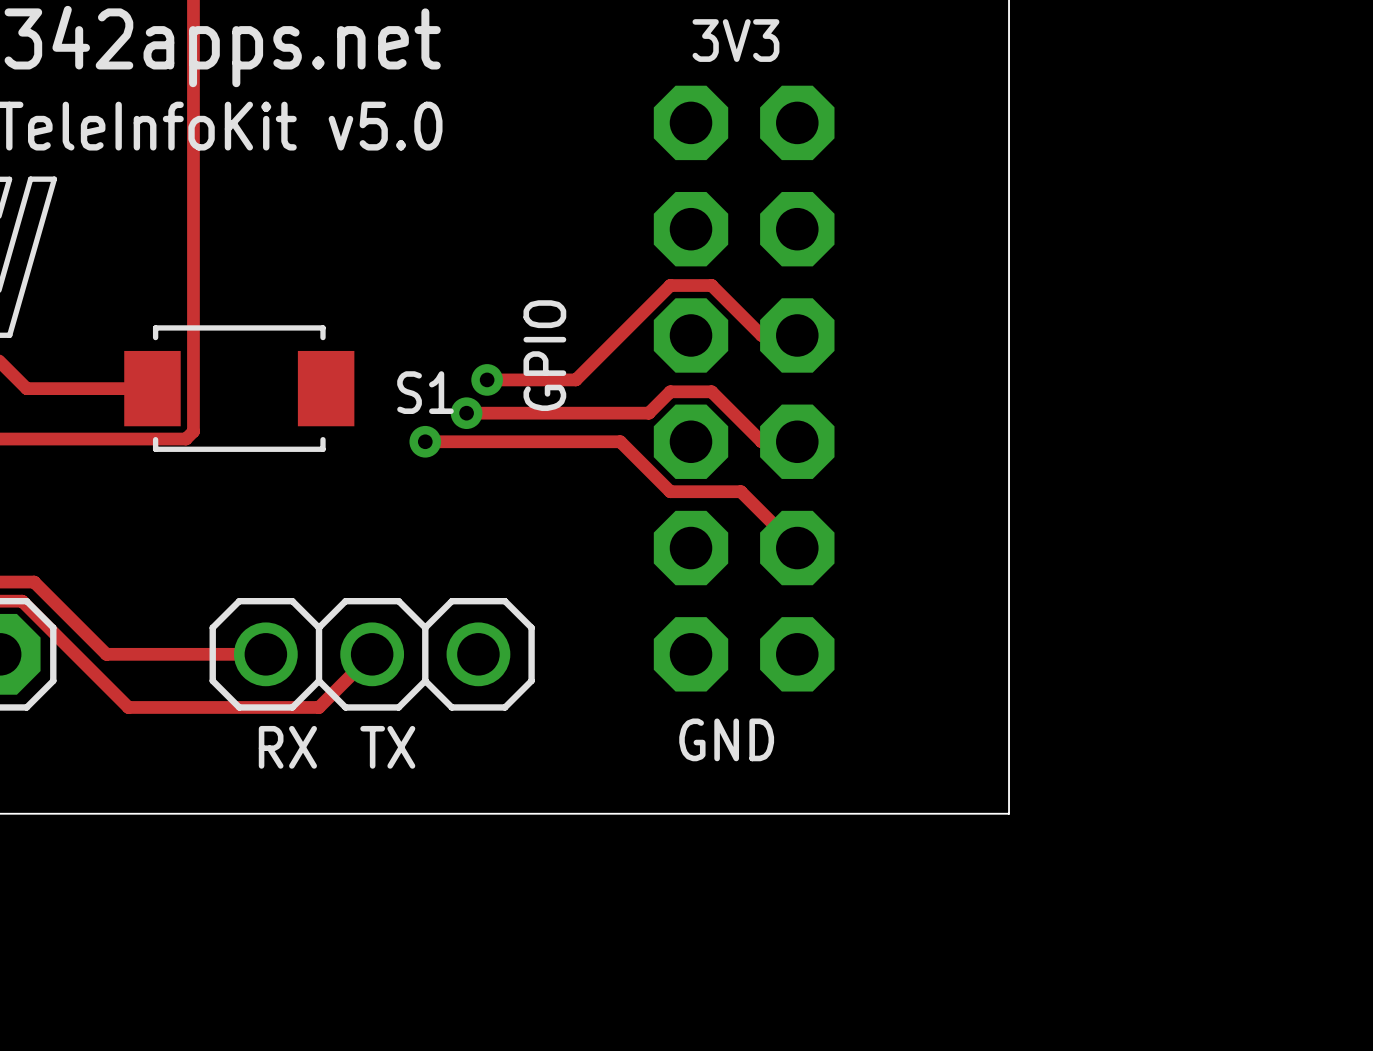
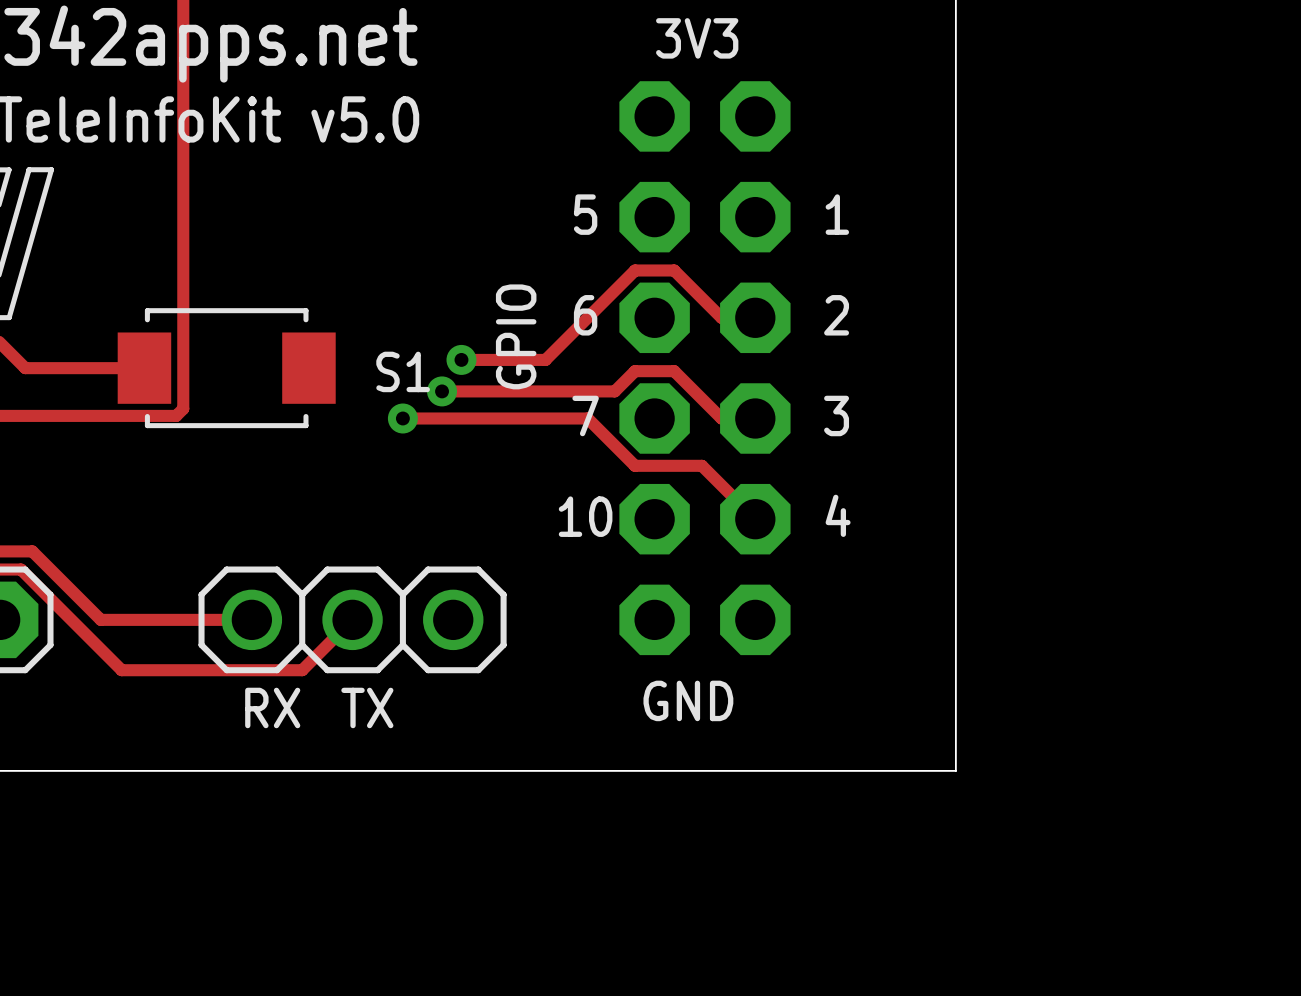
text: none -> 5 (585, 214)
text: none -> 1 (837, 214)
text: none -> 6 (585, 315)
text: none -> 2 (836, 315)
text: none -> 7 (585, 415)
text: none -> 3 (836, 415)
text: none -> 4 (838, 515)
text: none -> 10 (585, 516)

